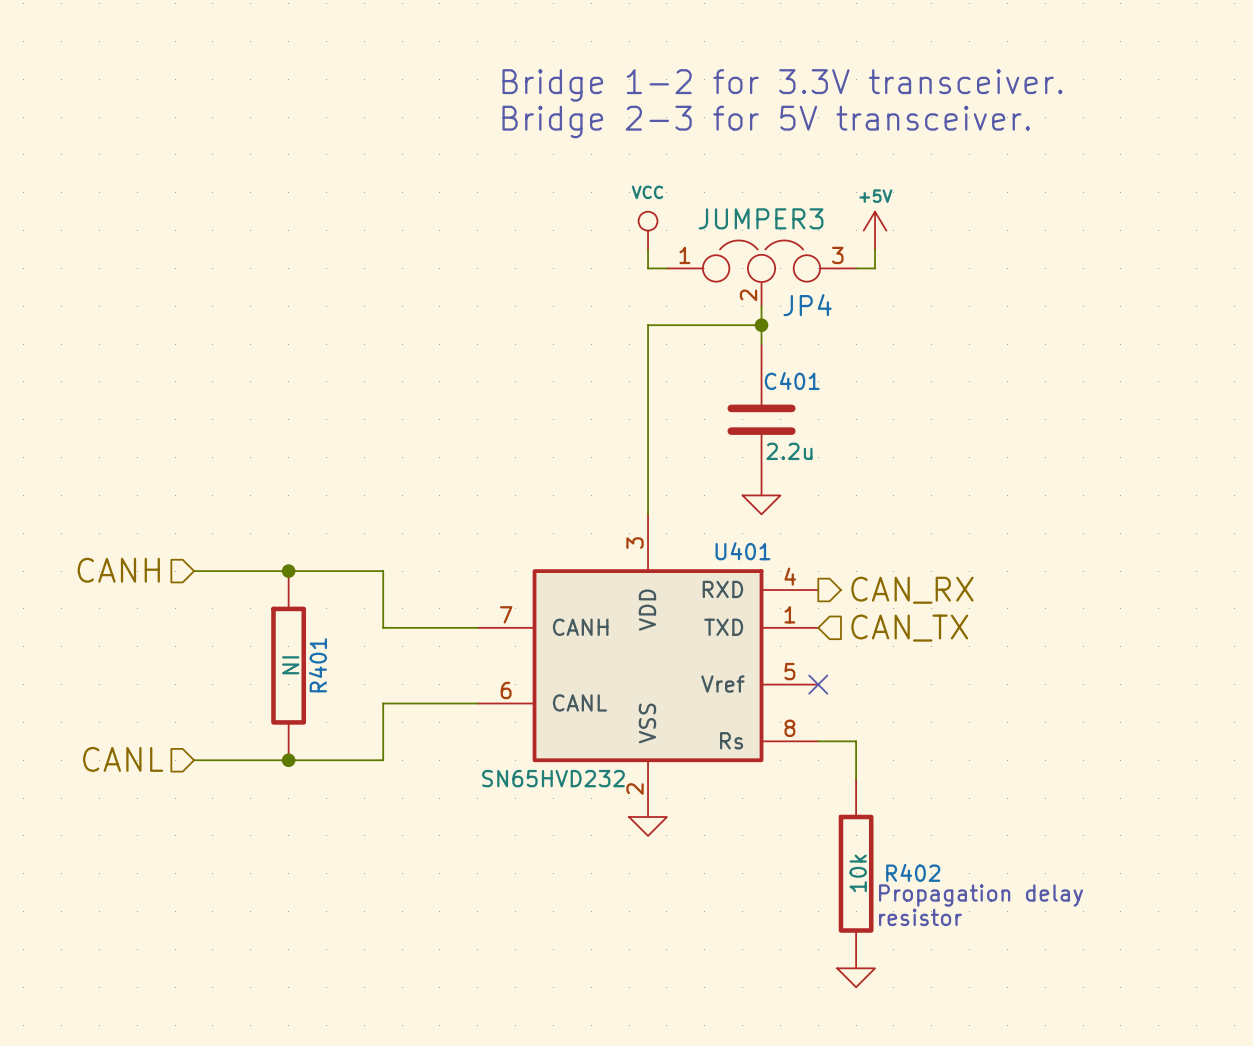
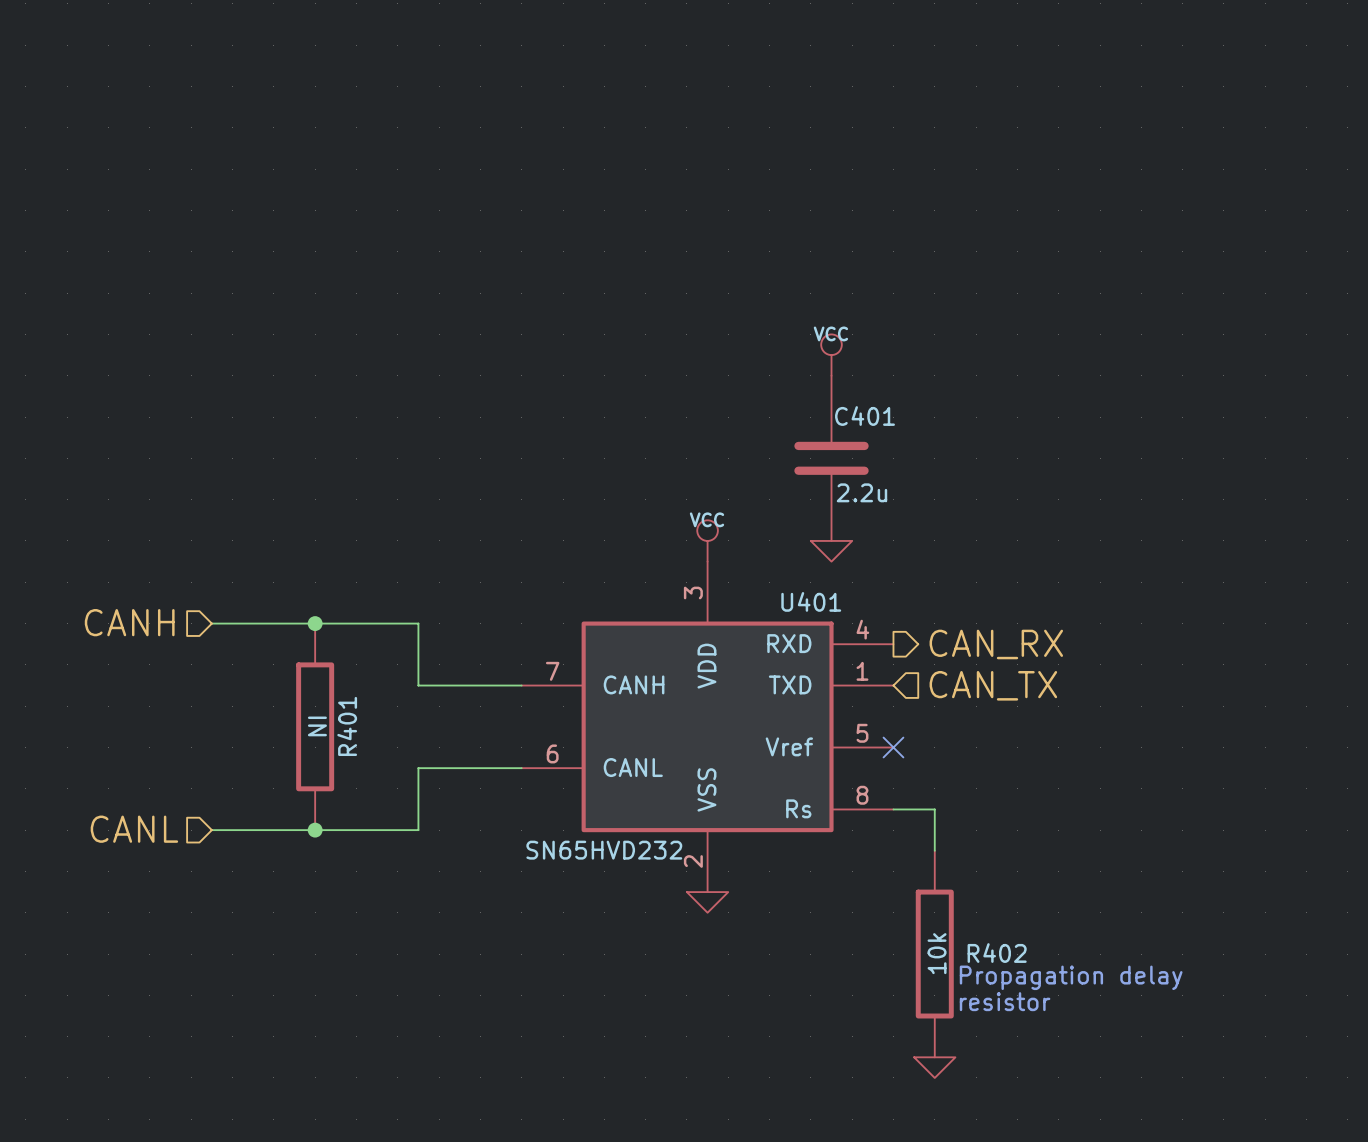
text: Bridge 1-2 for 3.3V transceiver. (782, 85) -> none
text: Bridge 2-3 for 5V transceiver. (766, 121) -> none
power symbol: VCC (648, 230) -> none
power symbol: +5V (875, 230) -> none
wire: (648, 249) (648, 268) (666, 268) -> none
wire: (875, 249) (875, 268) (856, 268) -> none
JP4: JUMPER3 (761, 273) -> none
wire: (761, 325) (648, 325) (648, 514) -> none
power symbol: none -> VCC (831, 355)
junction: (761, 325) -> none
power symbol: none -> VCC (707, 540)

